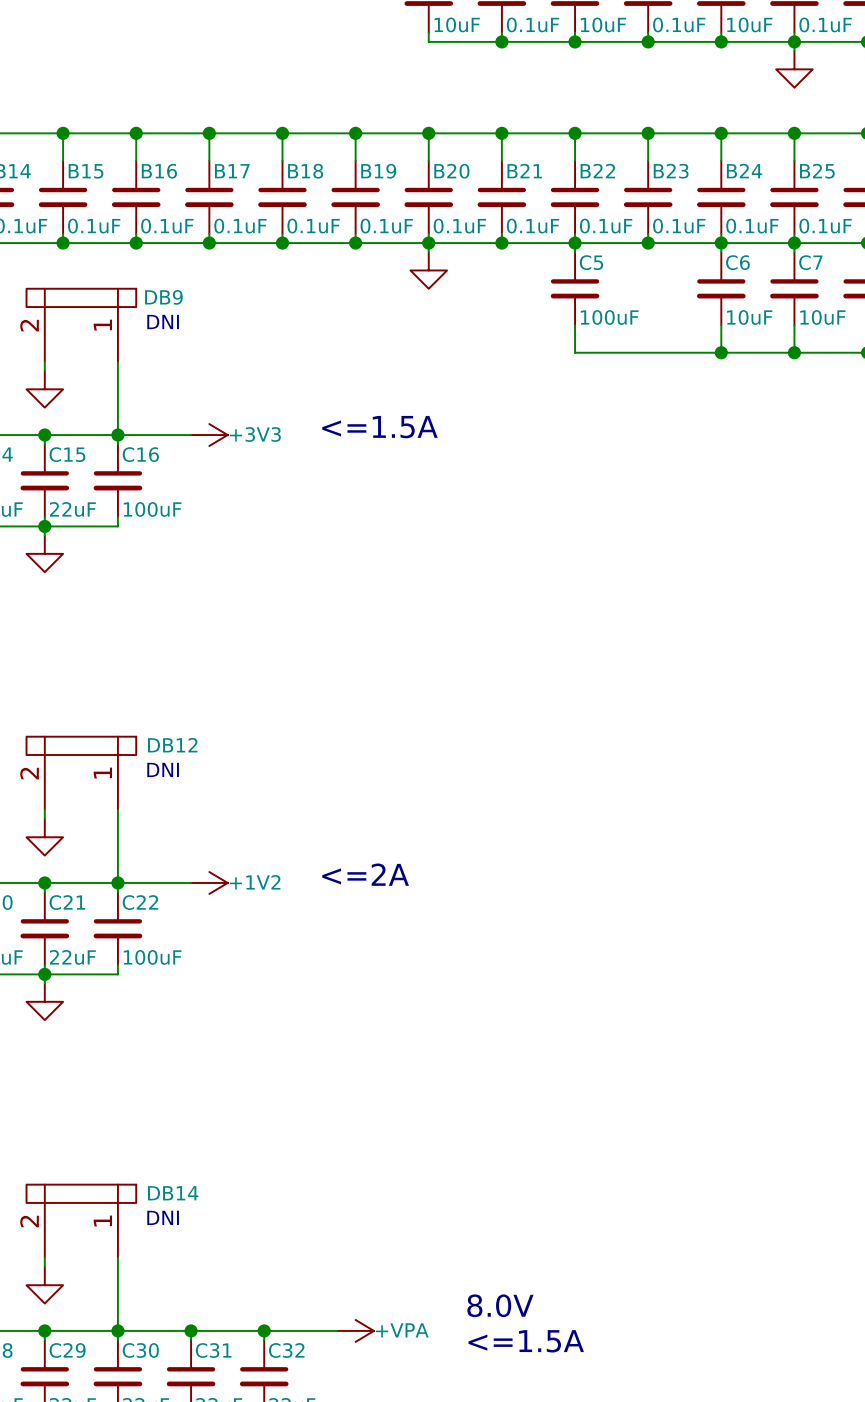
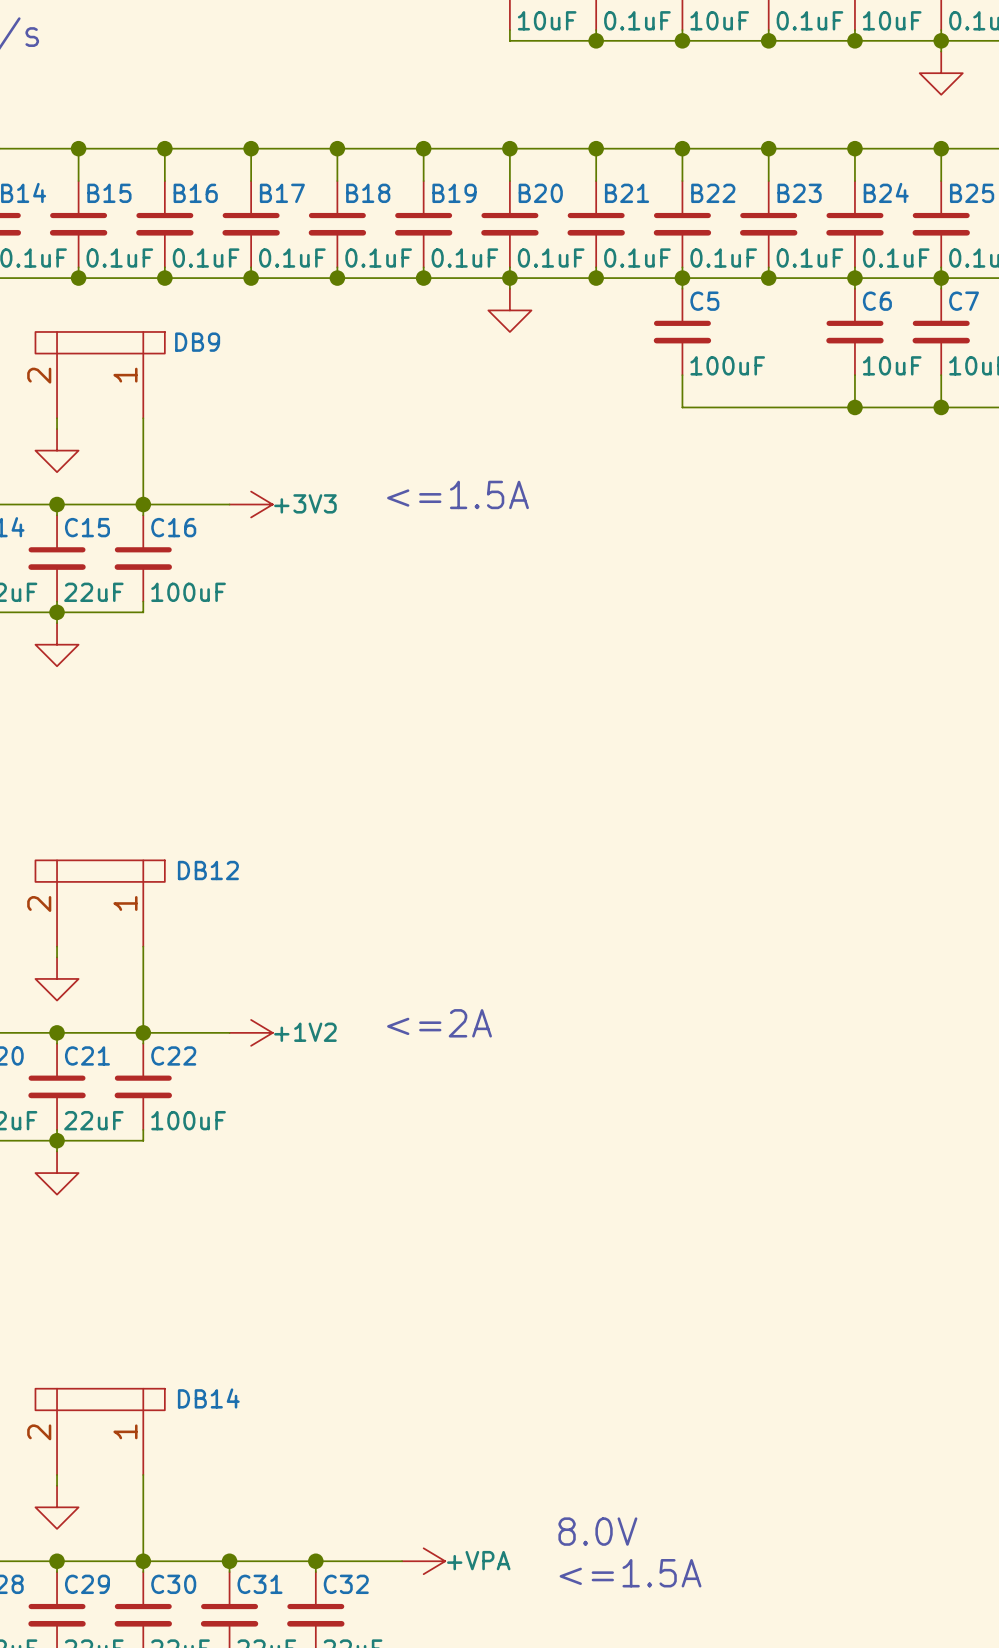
text: DNI (163, 321) -> none
text: DNI (163, 769) -> none
text: DNI (163, 1217) -> none

